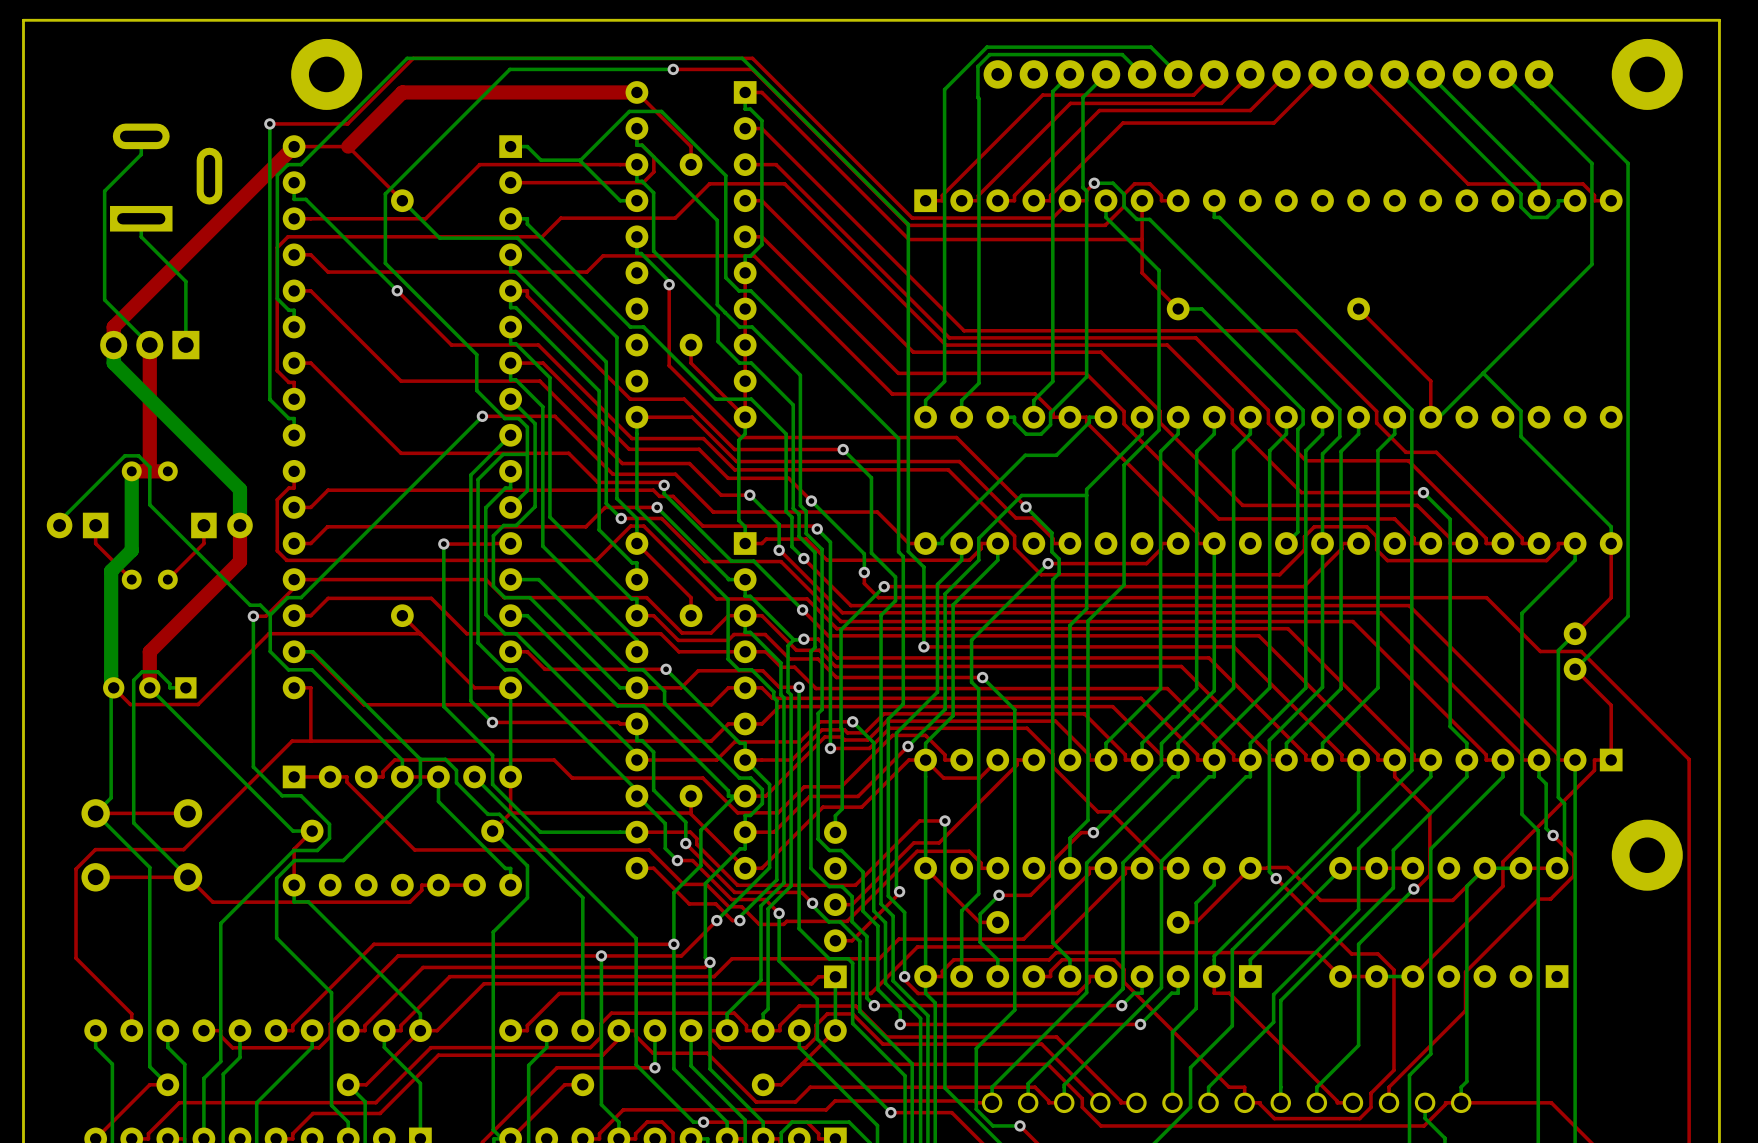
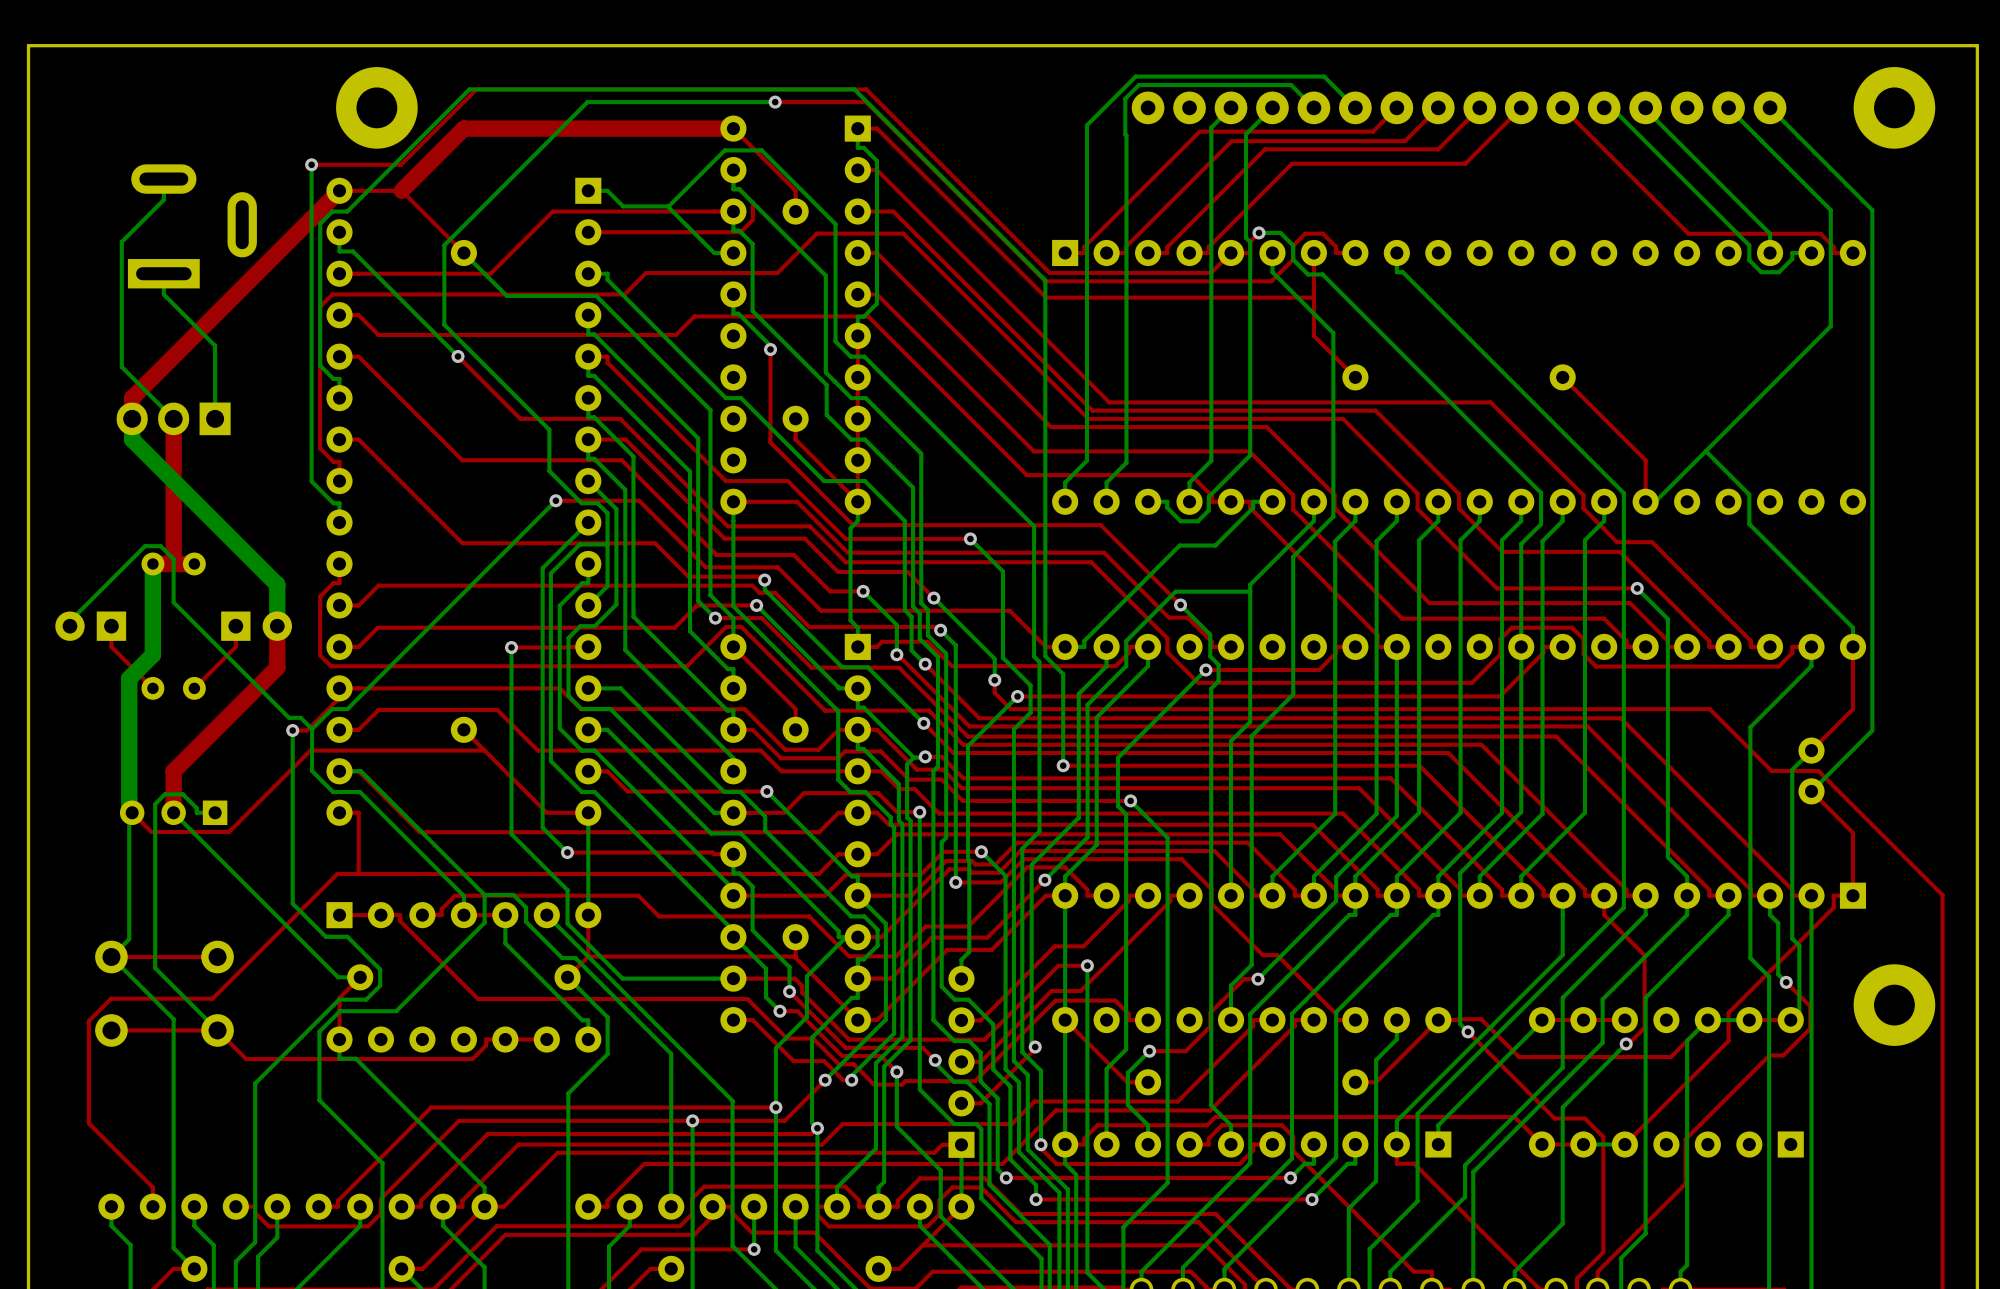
bottom track: (1178, 308) (1201, 308) (1303, 410) (1303, 424) (1297, 429) (1297, 532) (1286, 543) -> none
top track: (997, 760) (979, 778) (943, 778) (925, 760) -> (1148, 895) (1128, 895) (1128, 900) (1083, 946) (1054, 946) (980, 1020) (961, 1020)

